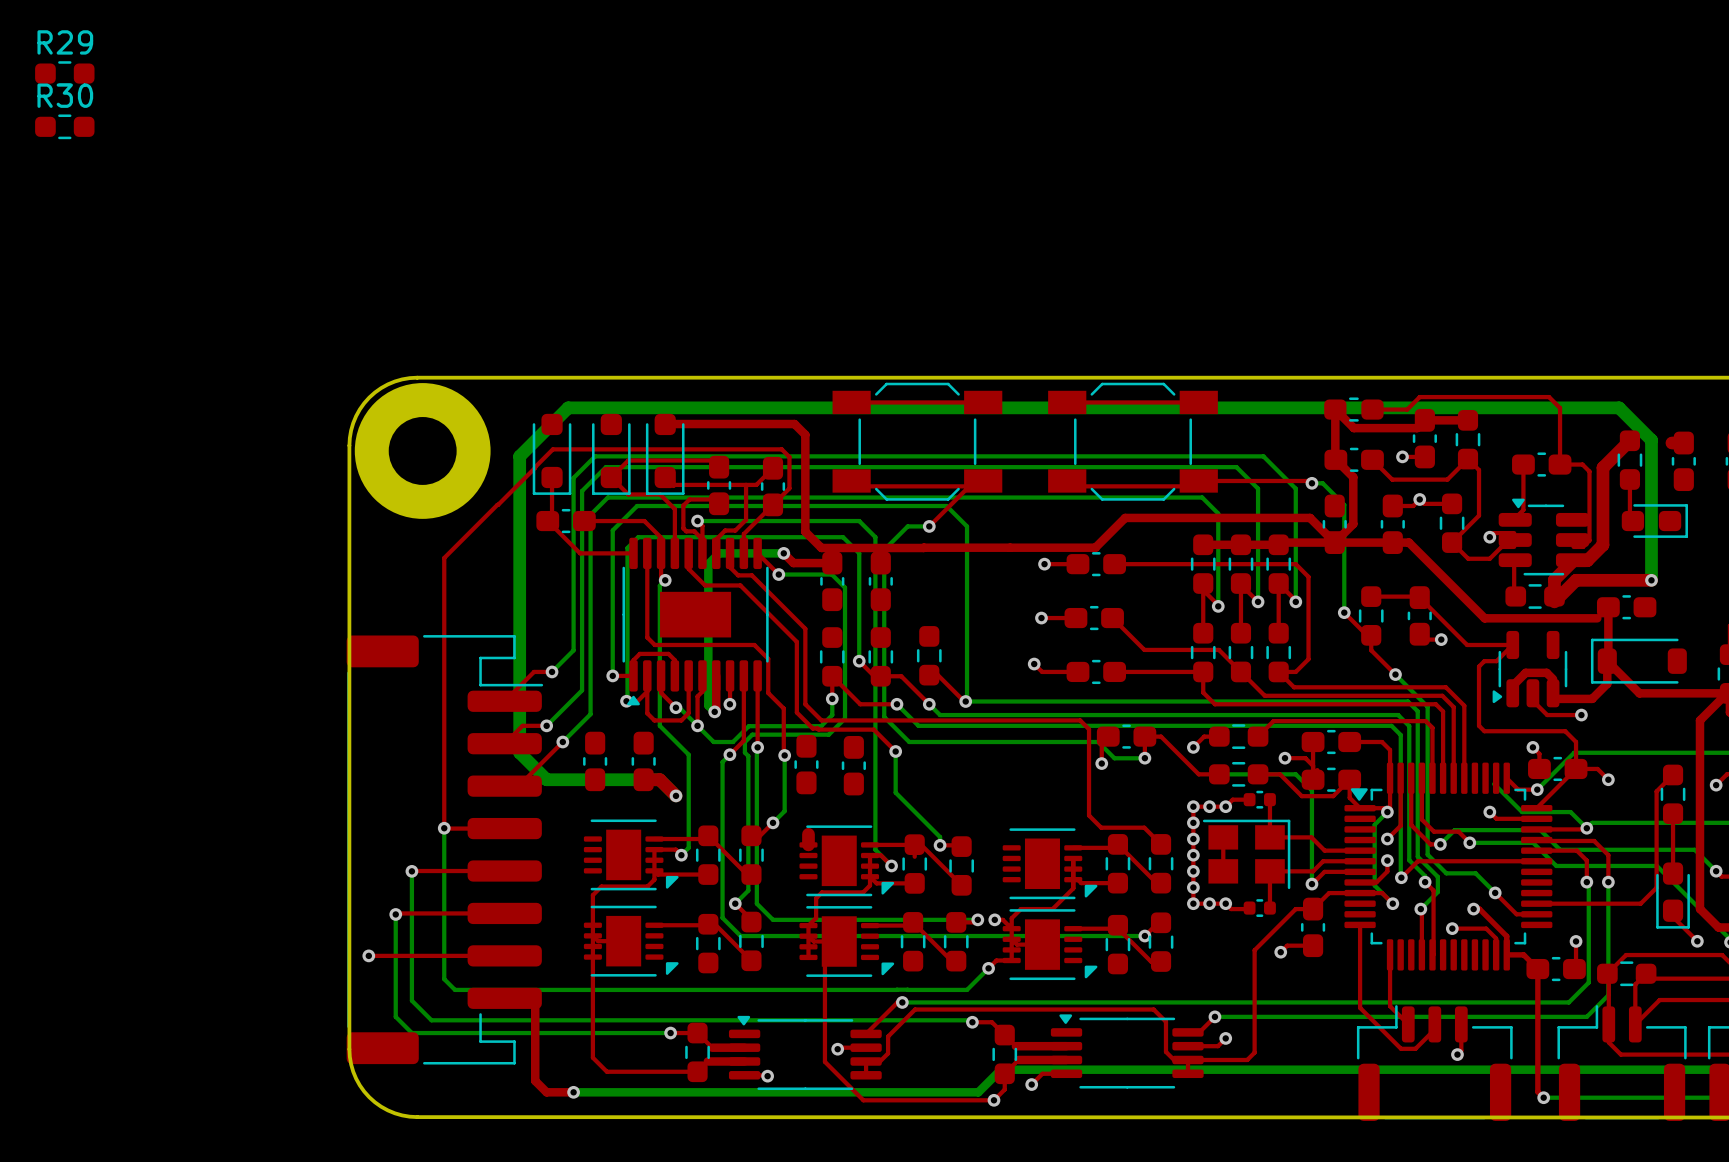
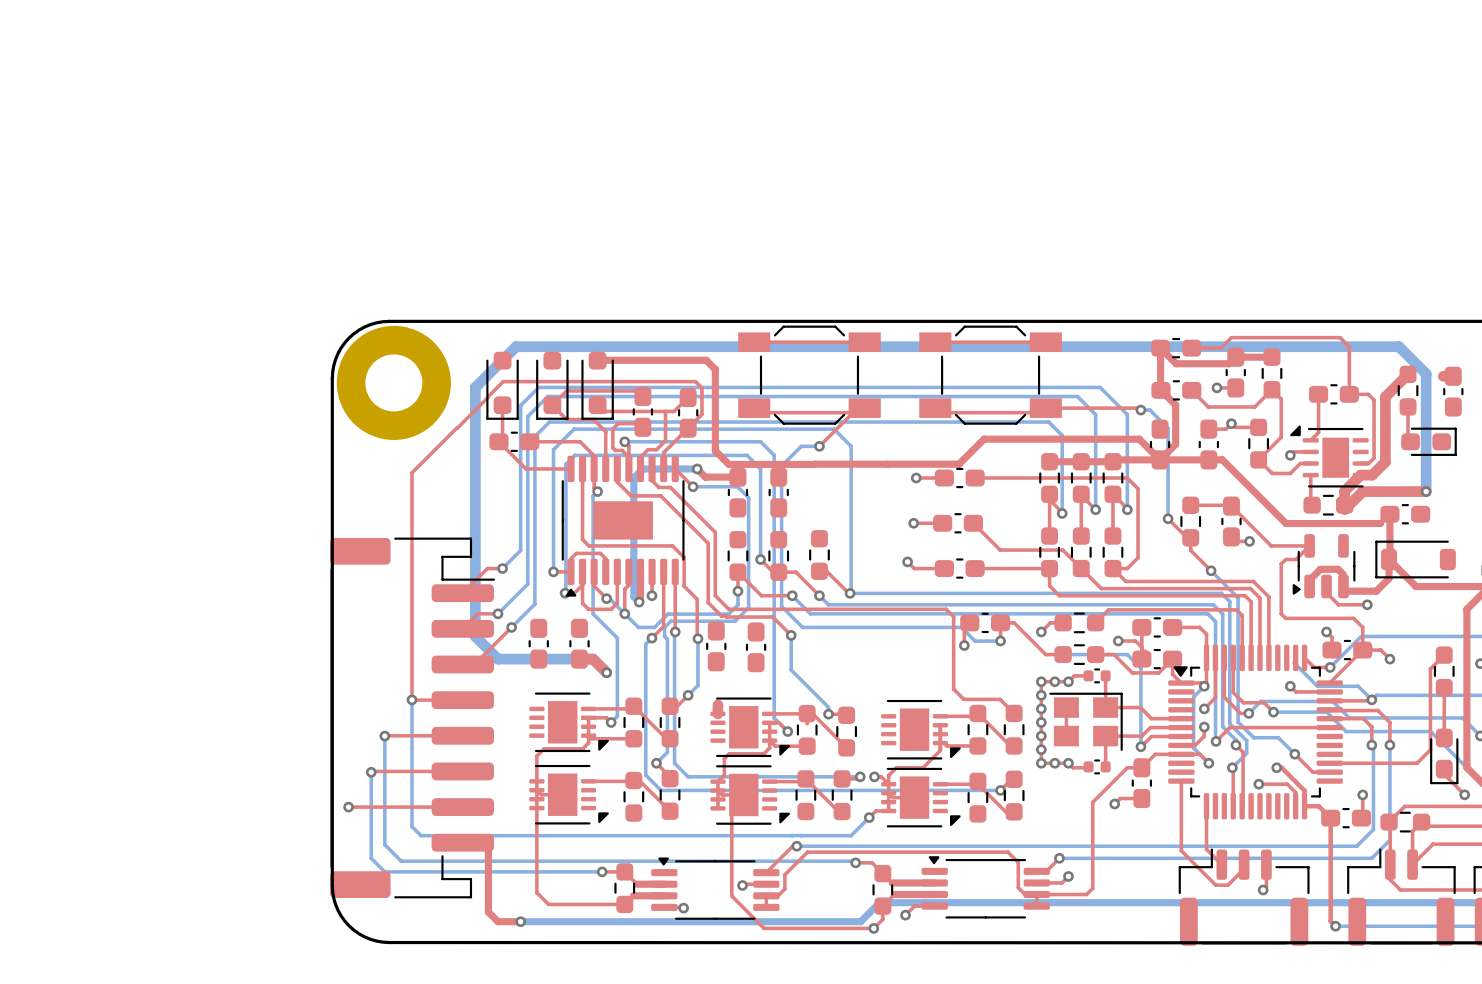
R29: (64, 73) -> none
R30: (64, 126) -> none
part footprint: [1498, 498, 1590, 576] -> [1290, 425, 1369, 488]

